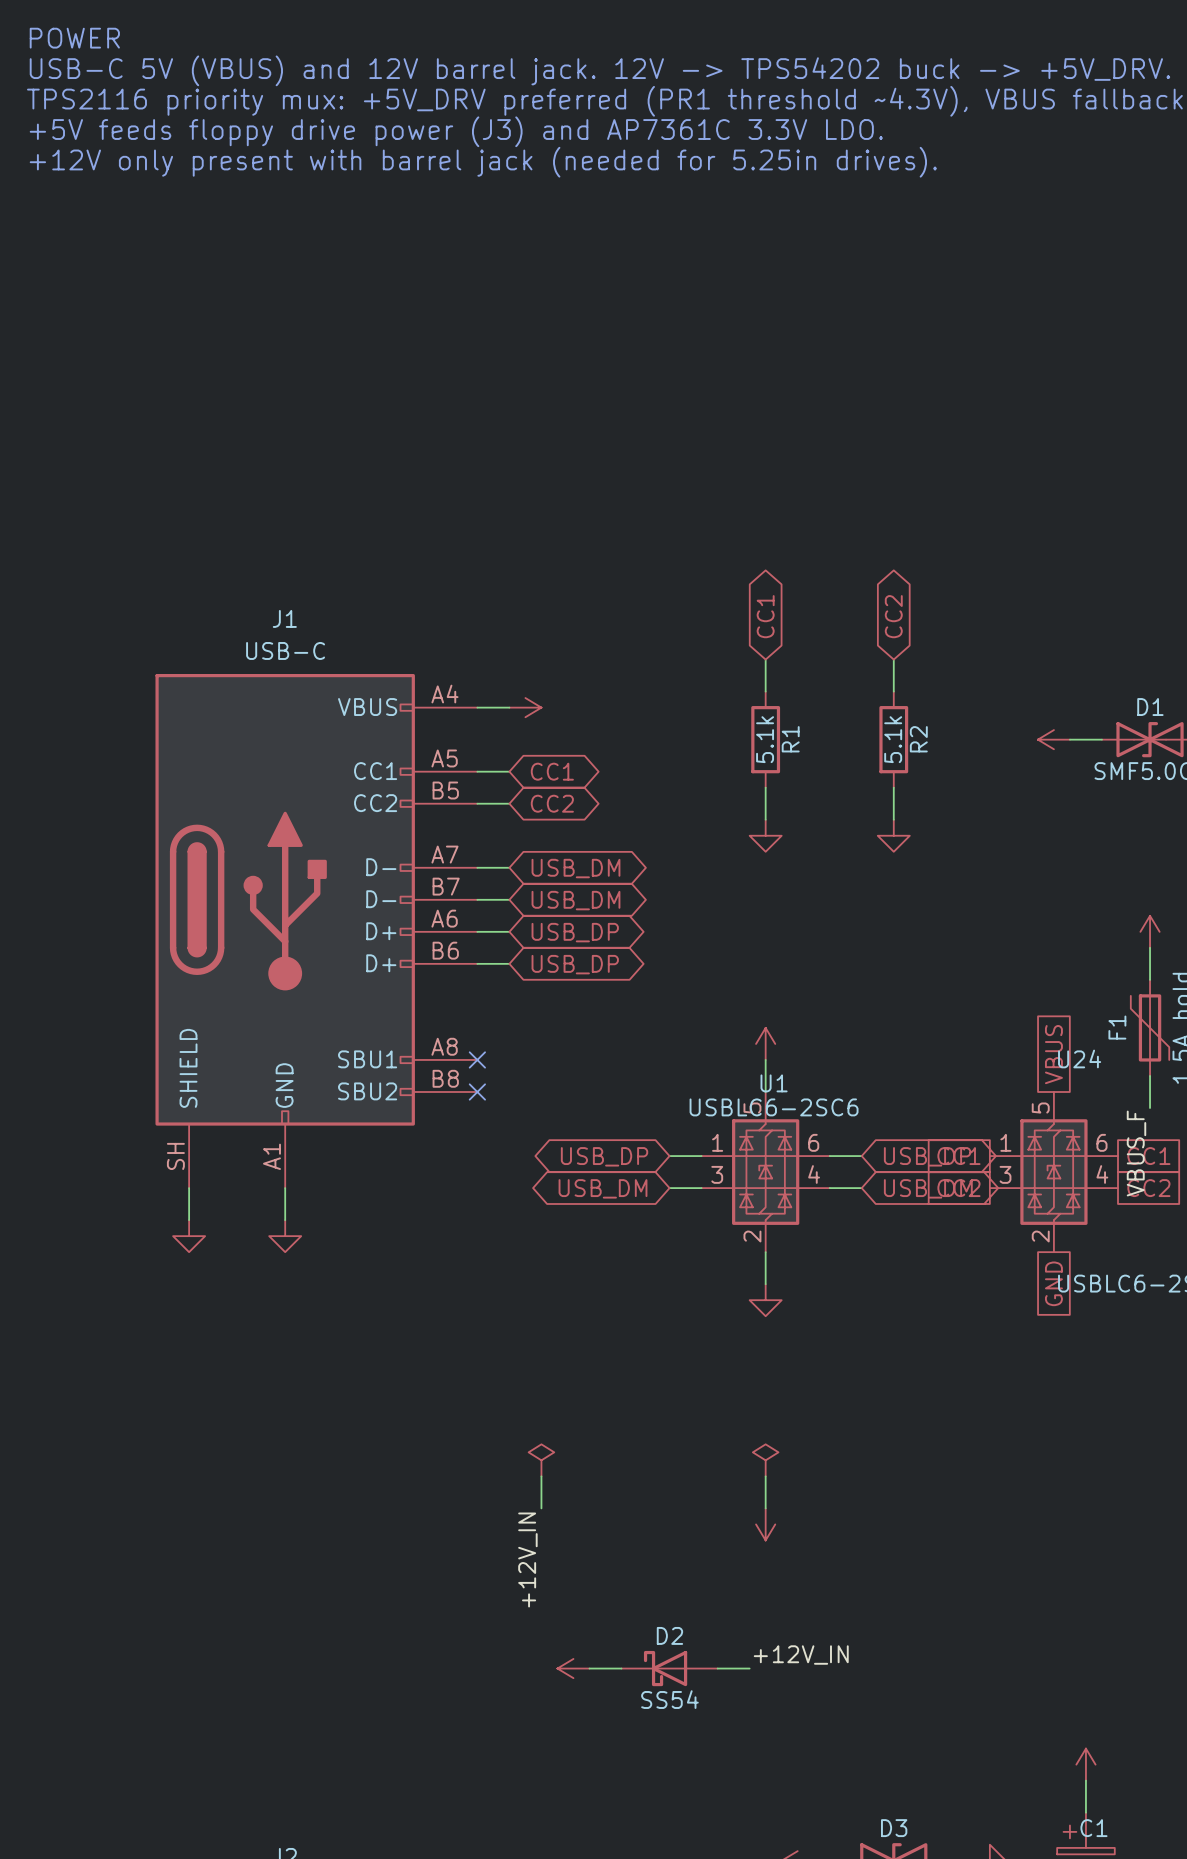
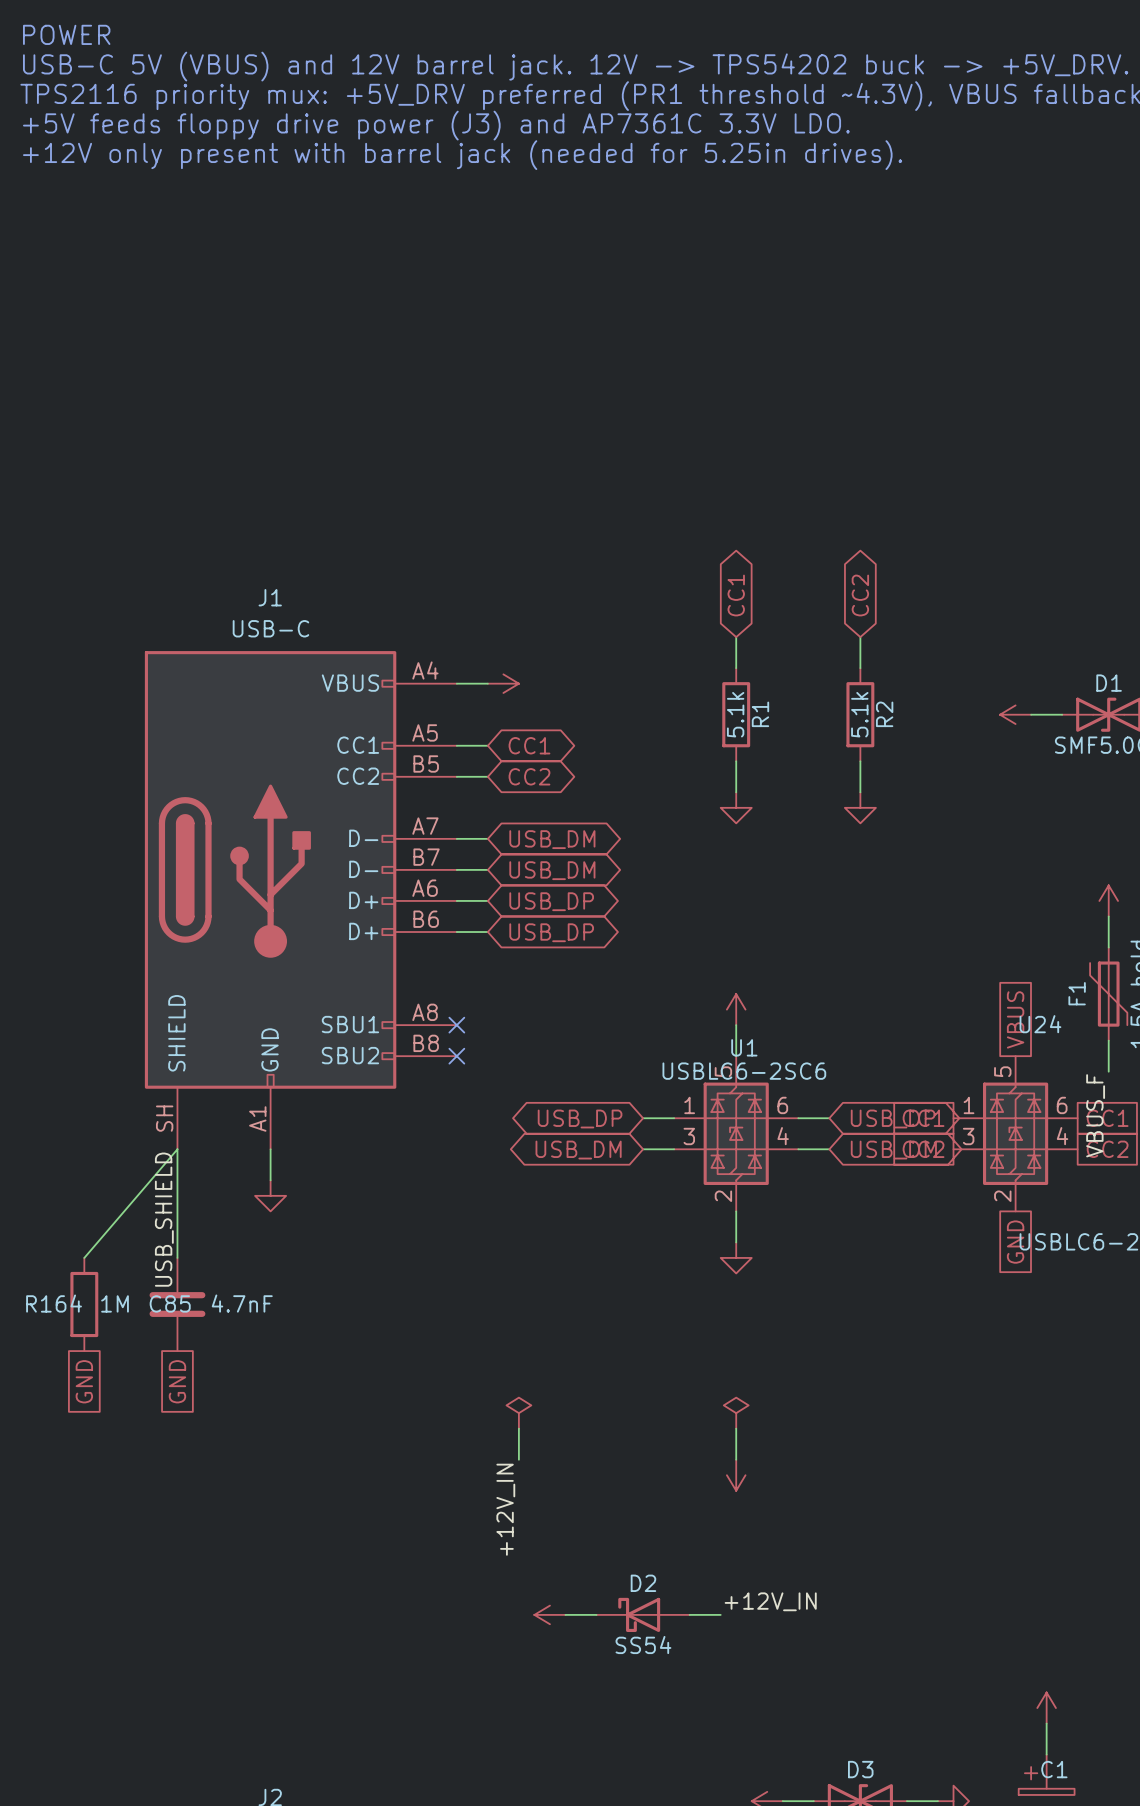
wire: none -> (177, 1149) (84, 1257)
wire: none -> (177, 1180) (177, 1257)
power symbol: (189, 1236) -> none
label: none -> USB_SHIELD (164, 1219)
R164: none -> 1M (84, 1304)
C85: none -> 4.7nF (177, 1304)
global label: none -> GND (84, 1381)
global label: none -> GND (177, 1381)

